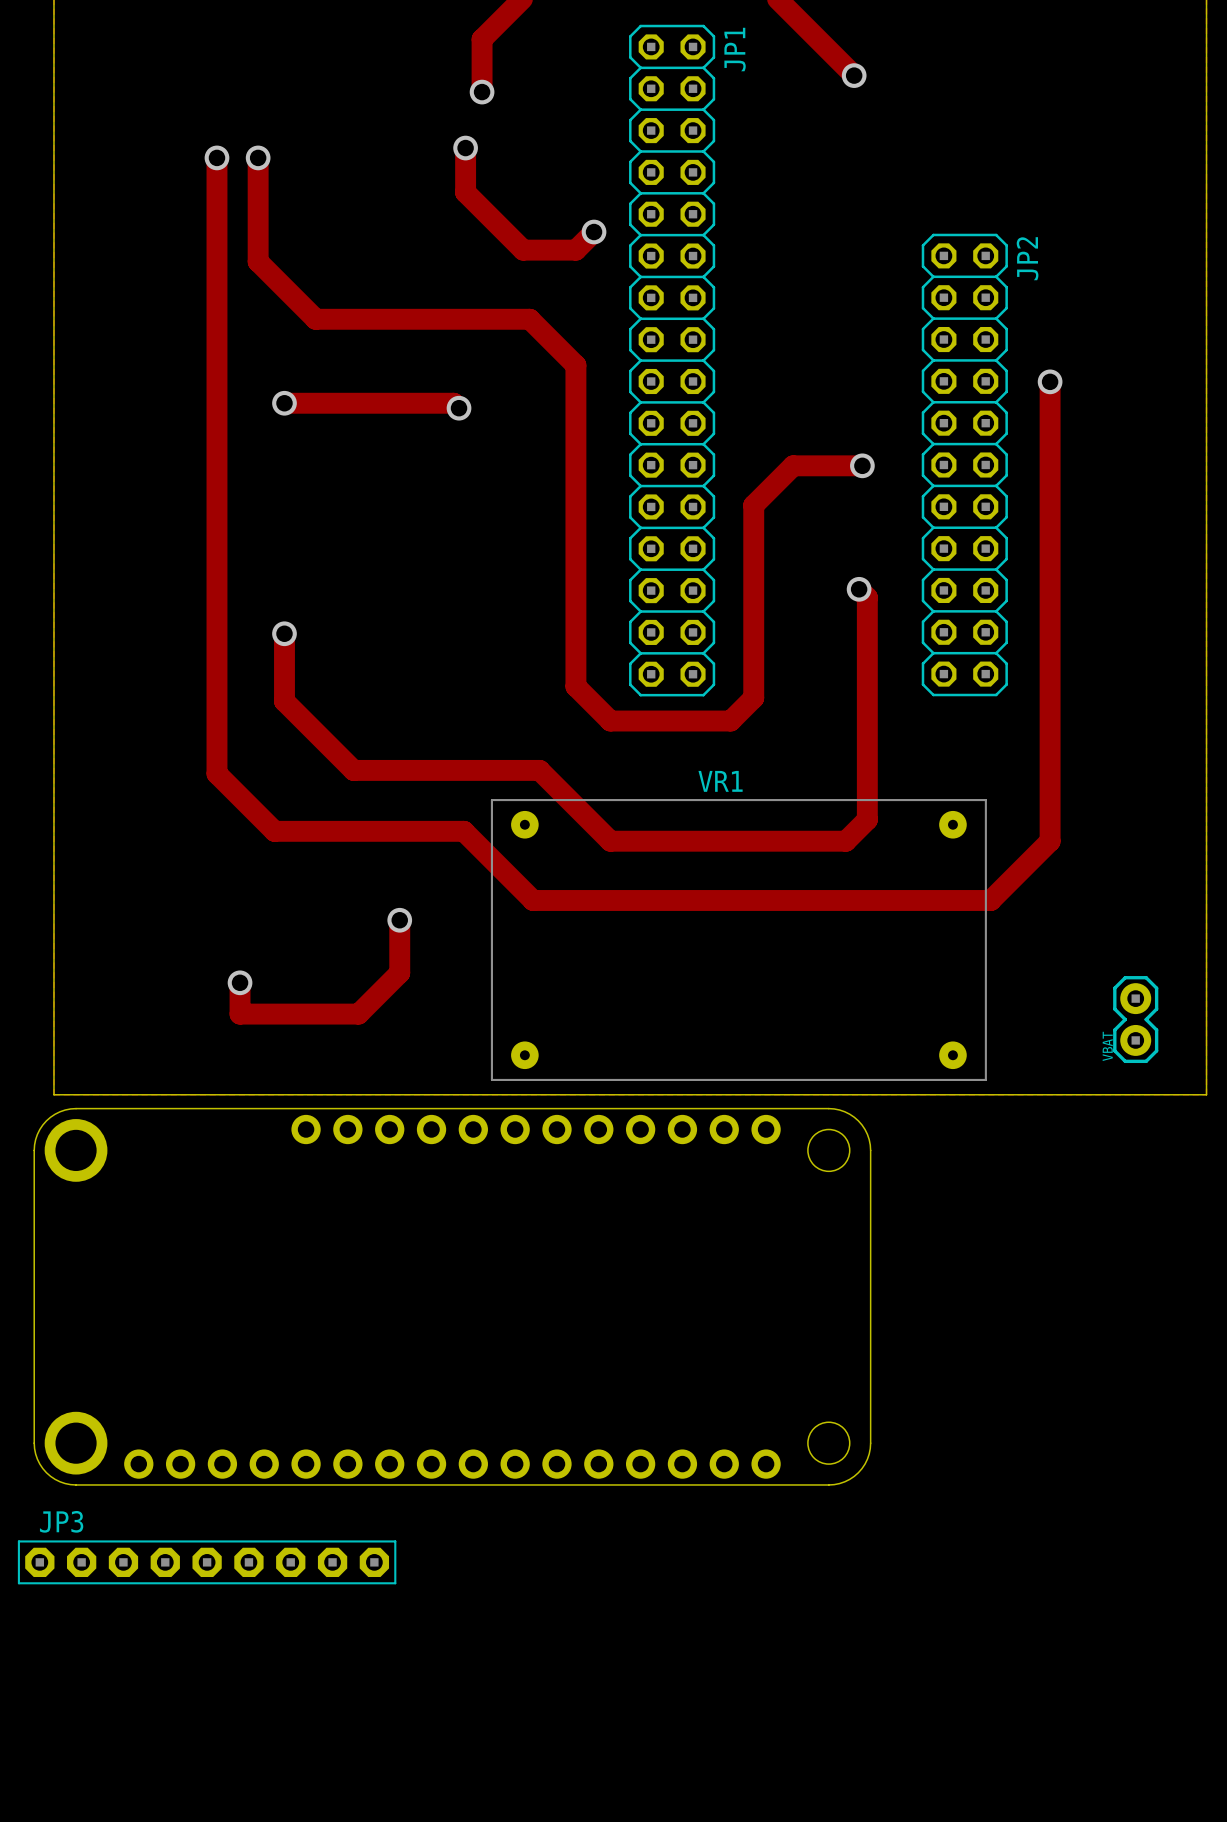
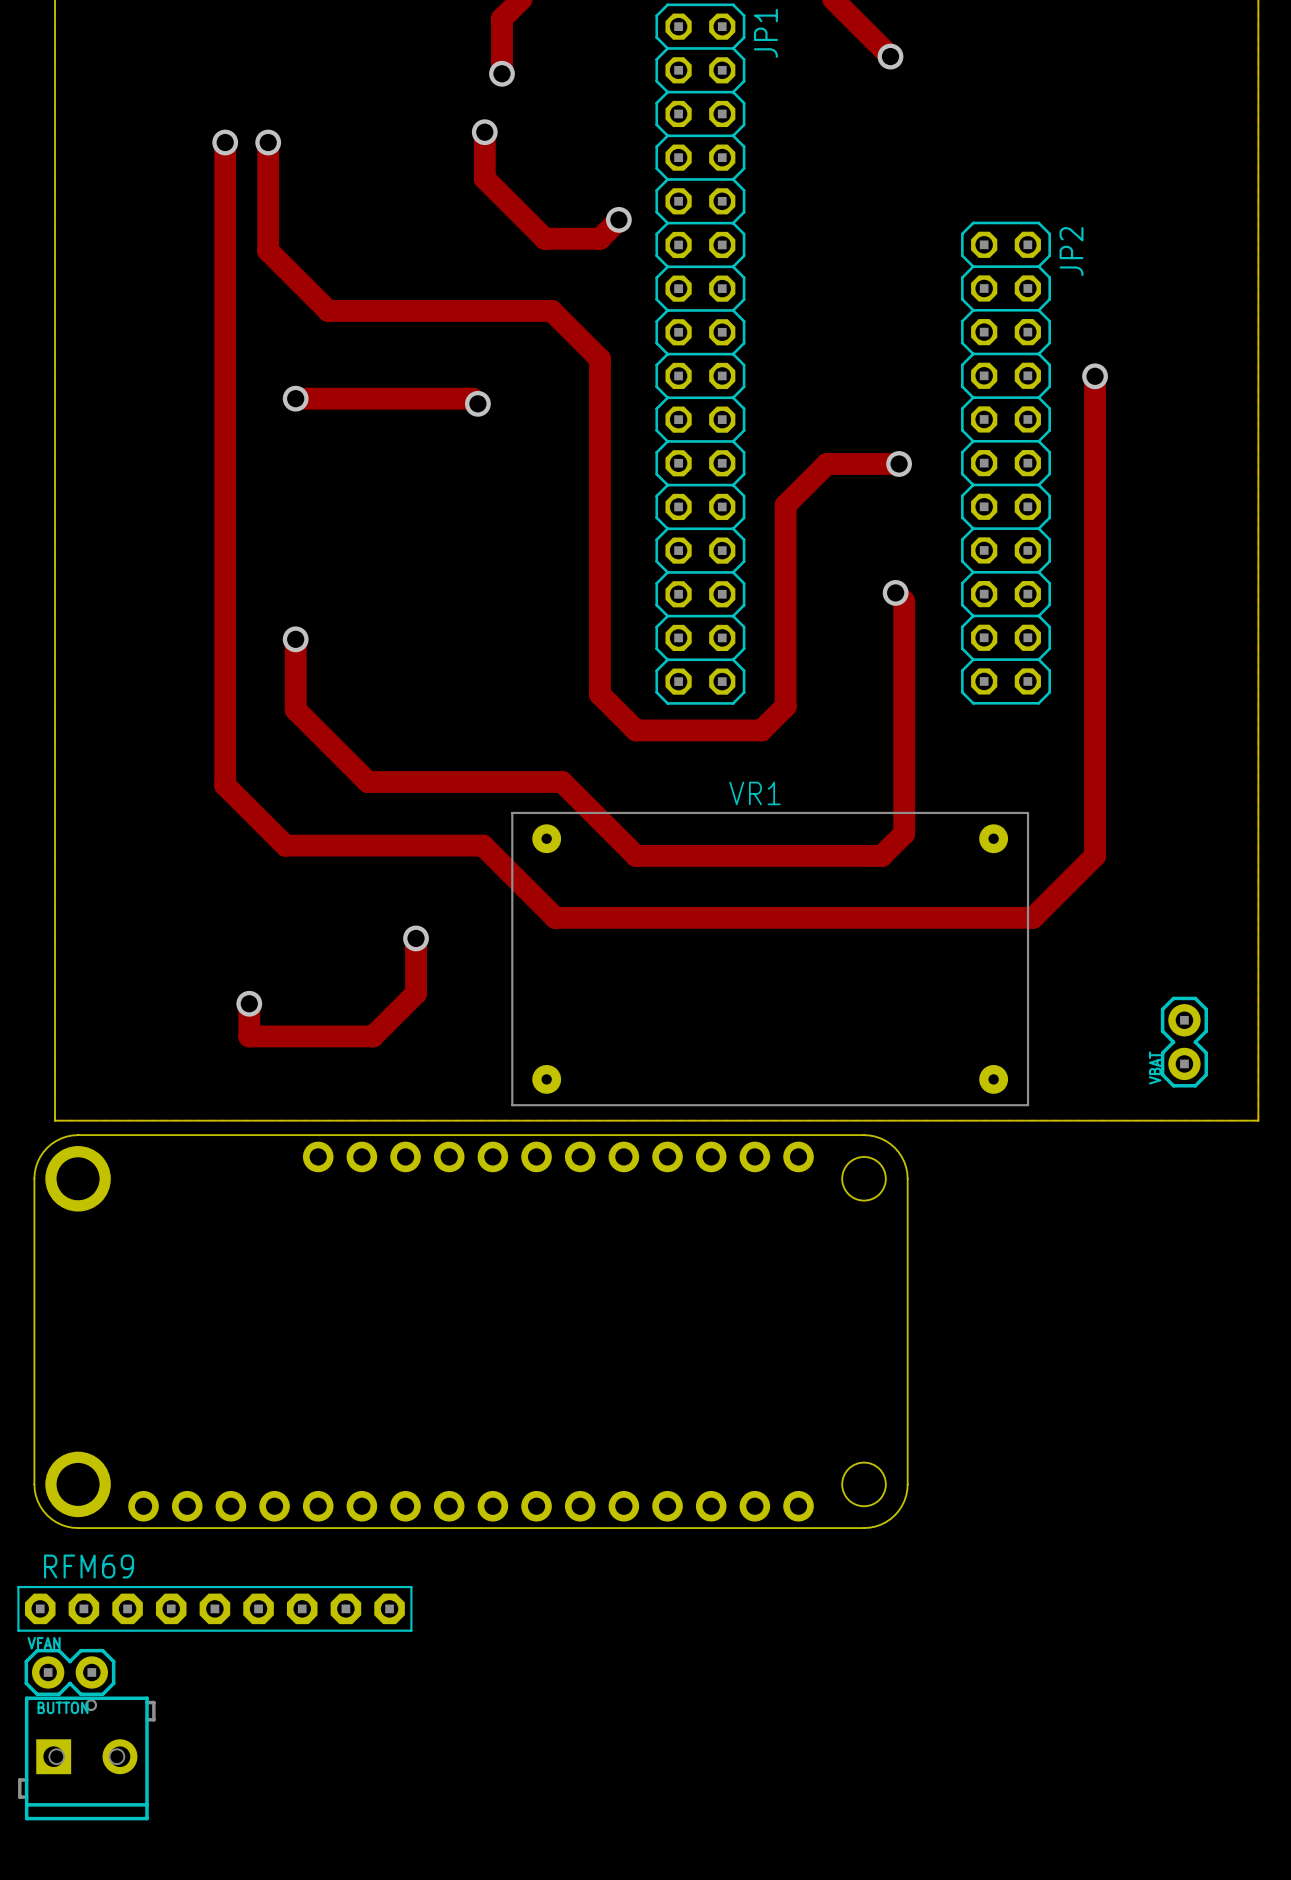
JP3 name: JP3 (61, 1521) -> RFM69 (89, 1566)
VFAN: none -> (69, 1672)
BUTTON: none -> (86, 1758)

